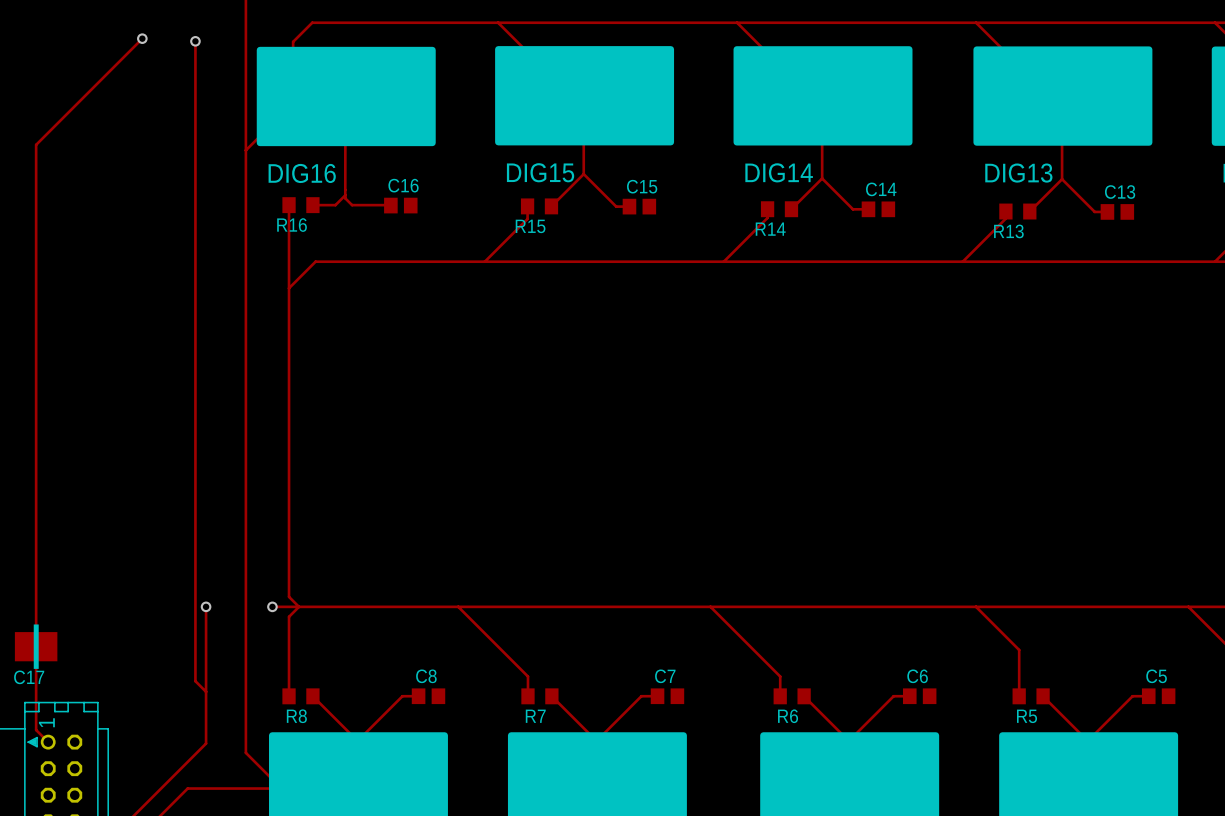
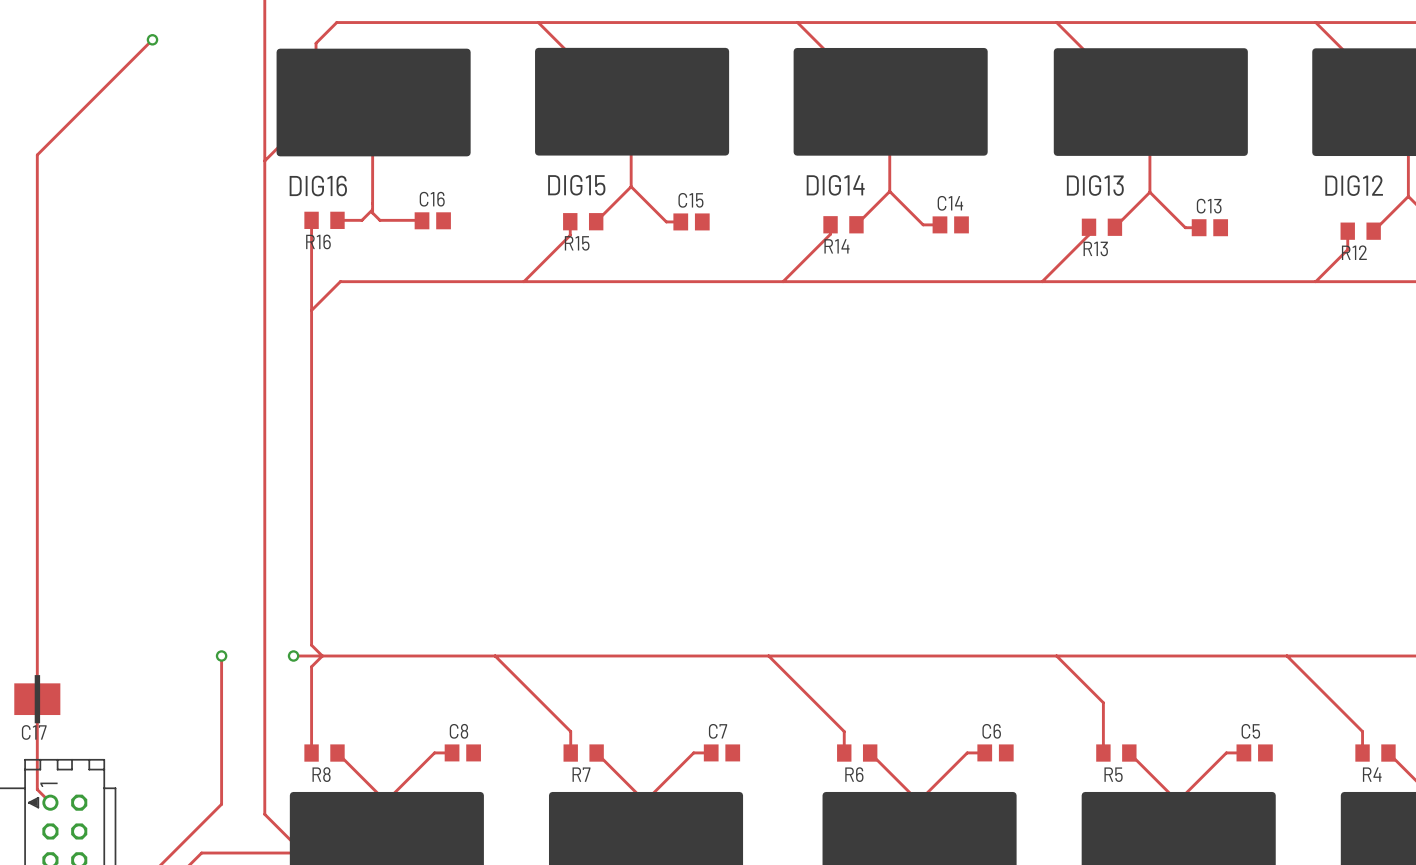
track: (195, 41) (195, 681) (206, 691) -> none
via: (195, 41) -> none

